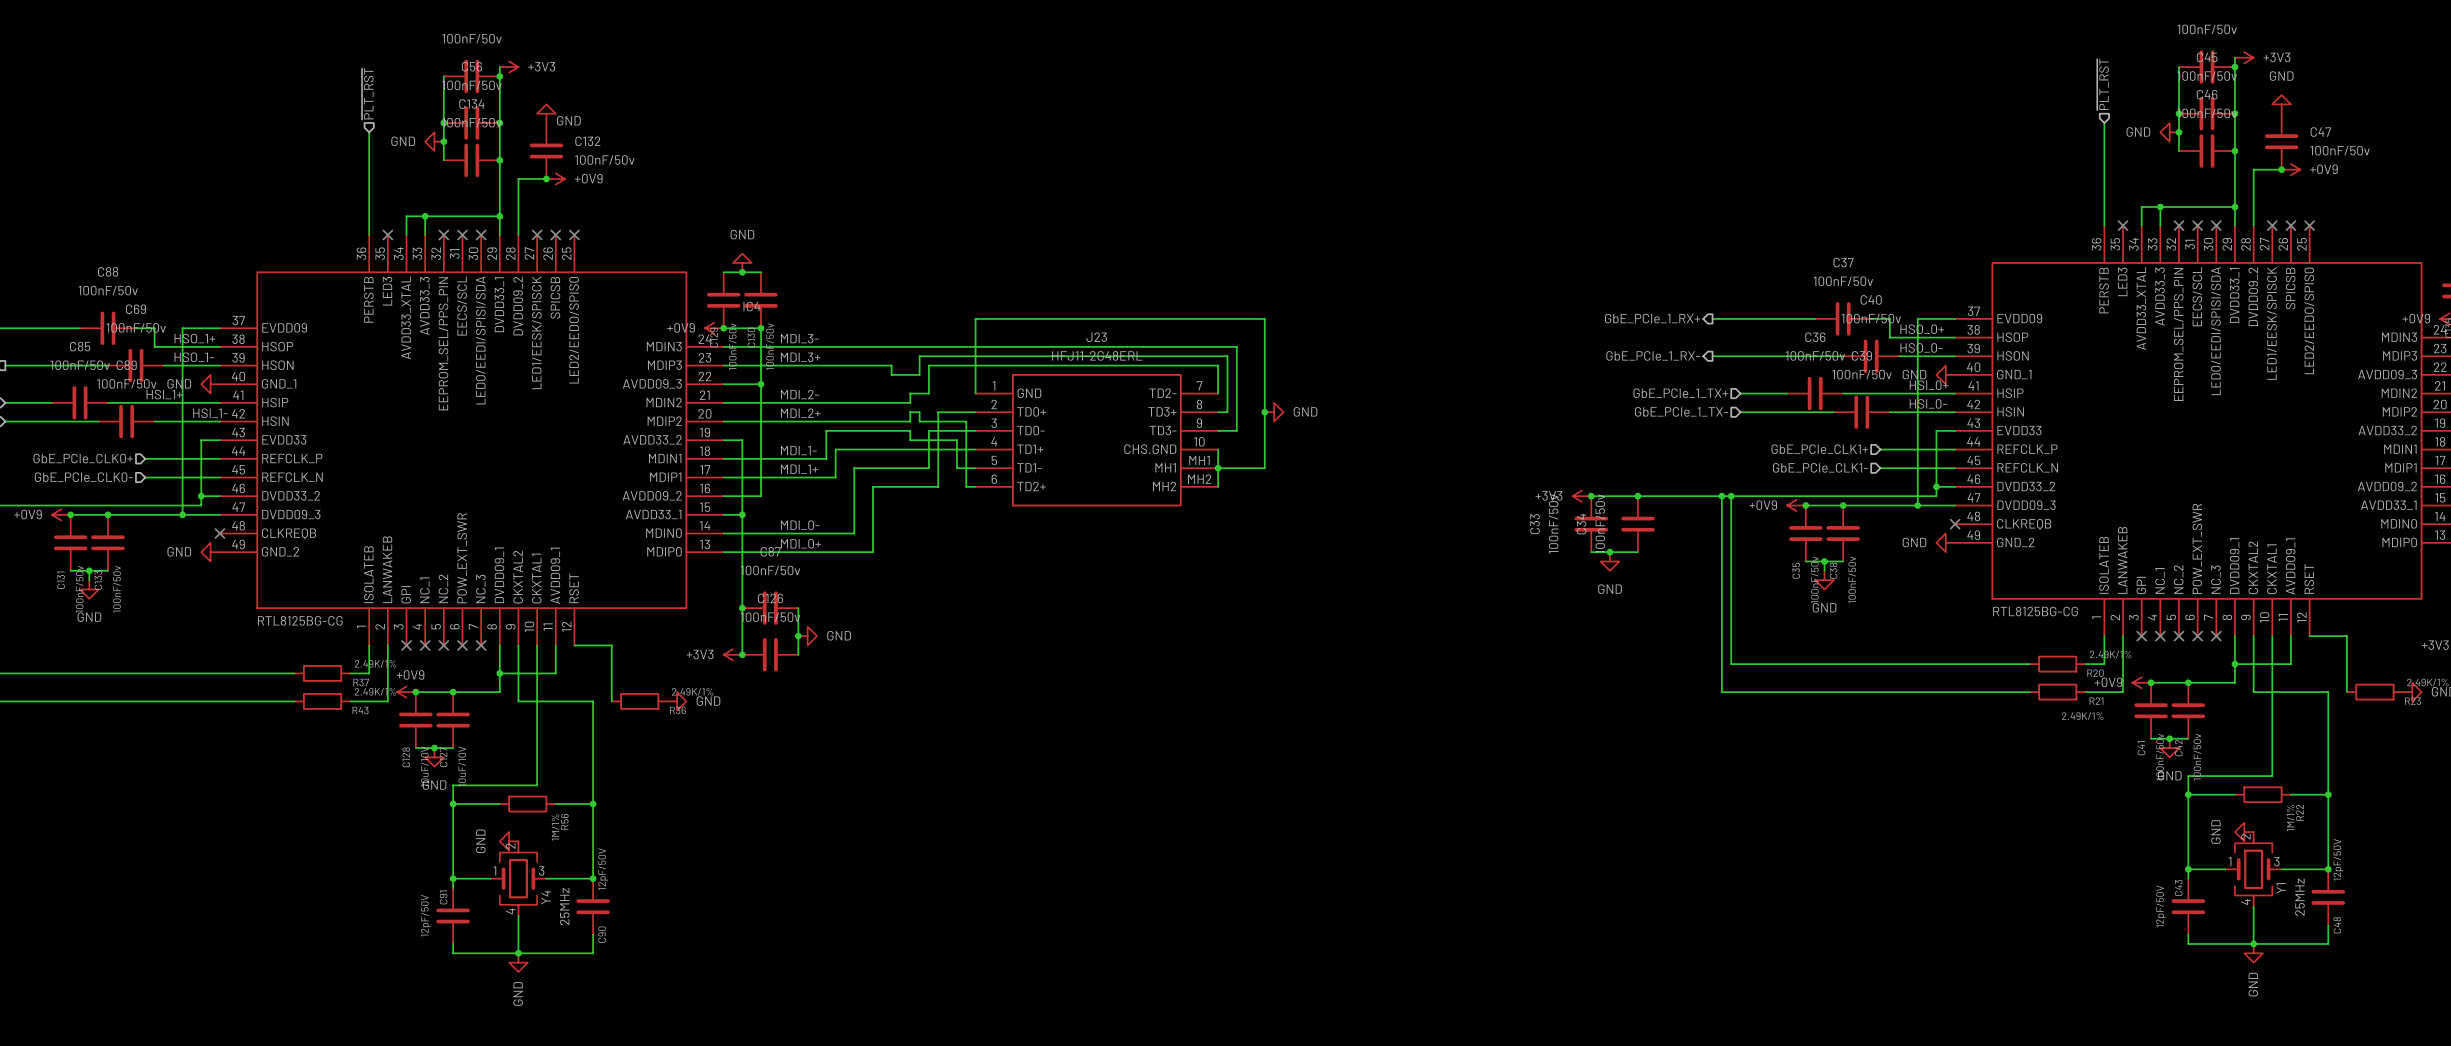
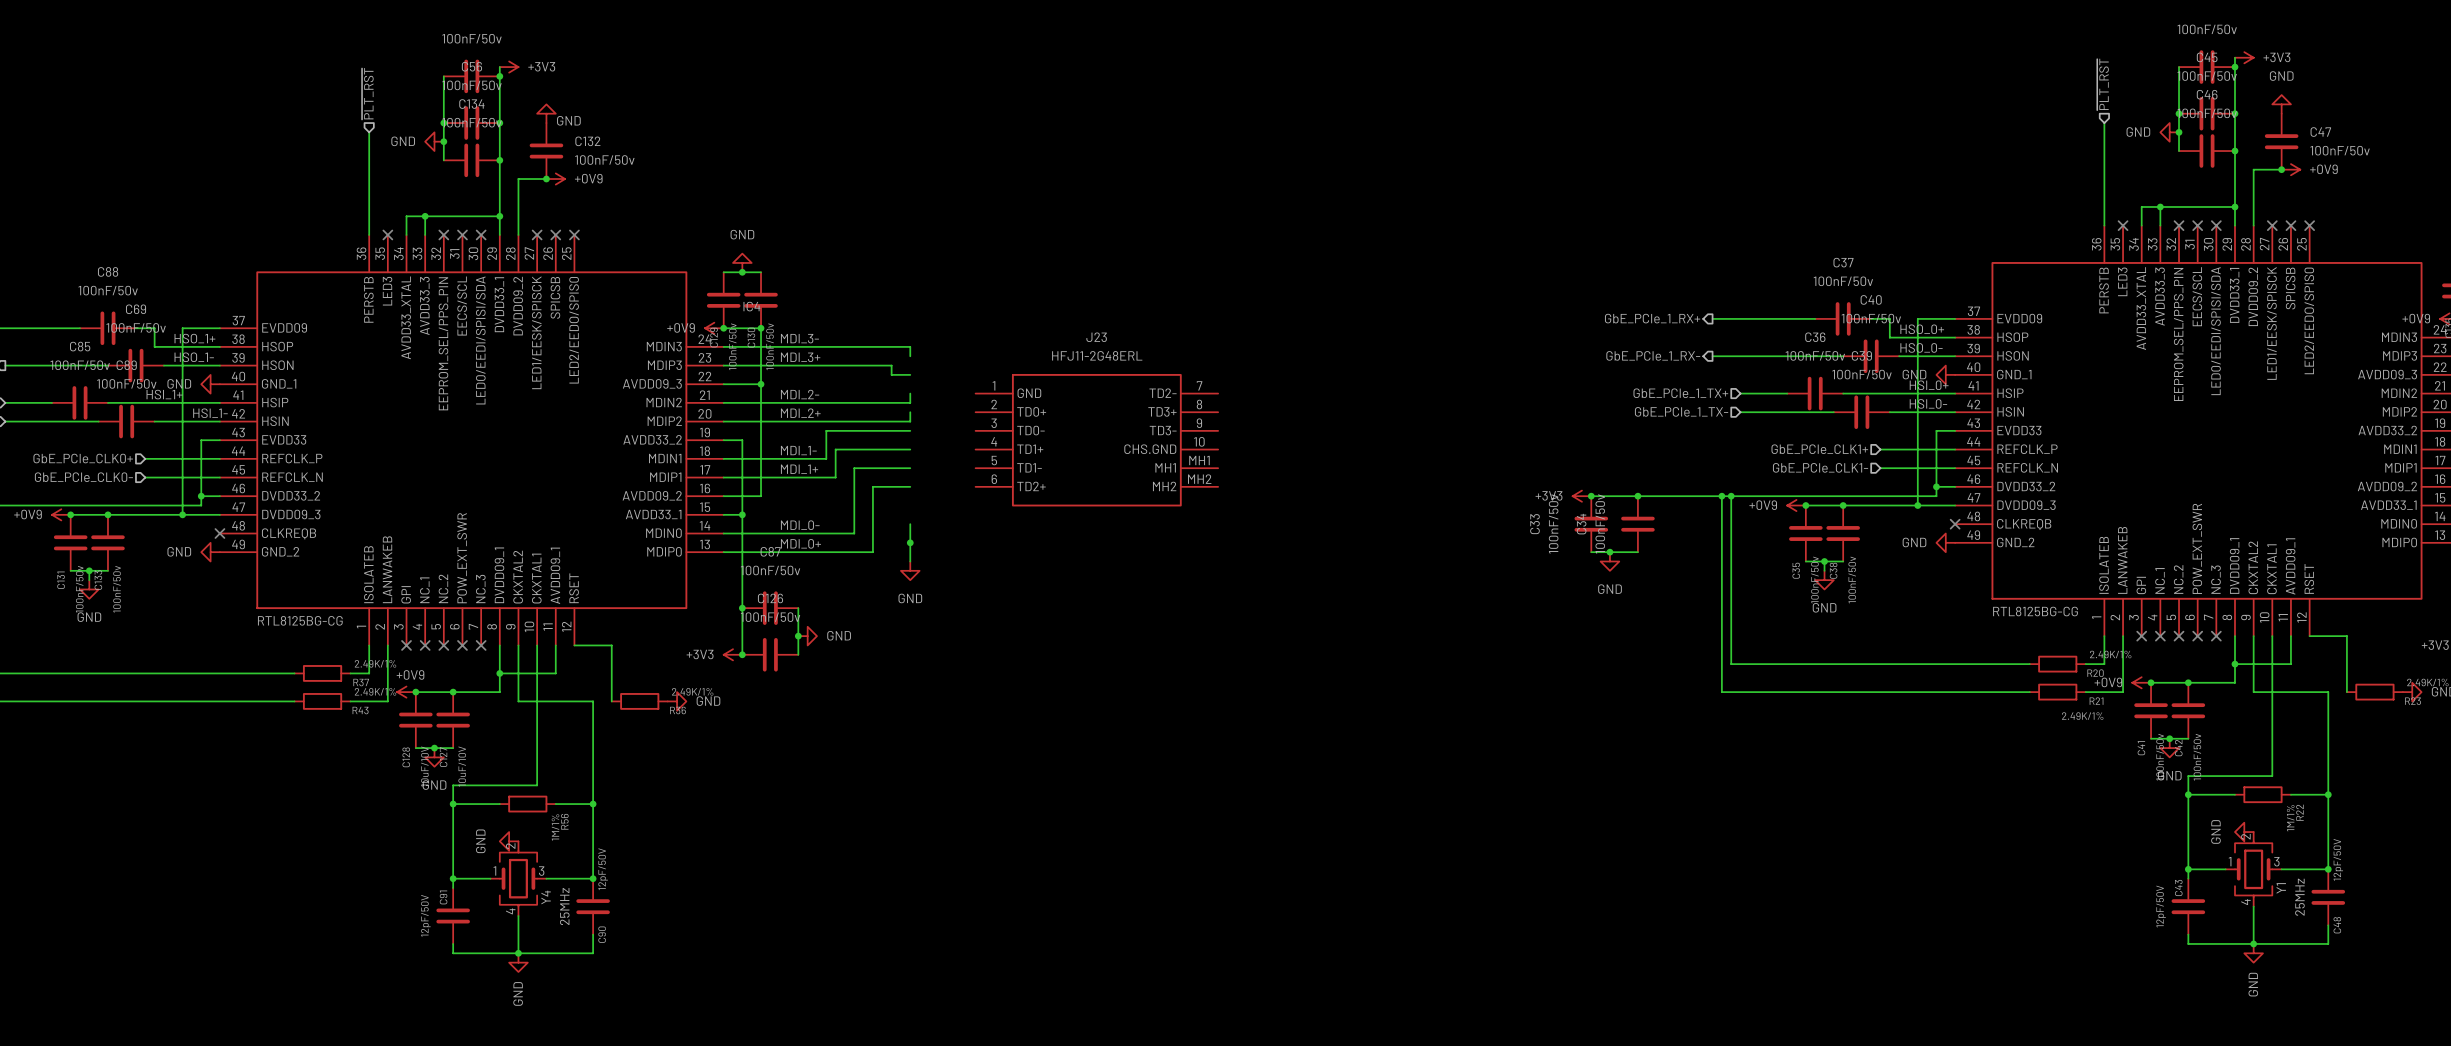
wire: (910, 346) (1236, 346) (1236, 430) (1218, 430) -> (910, 346) (910, 356)
wire: (910, 374) (919, 374) (919, 356) (1227, 356) (1227, 412) (1218, 412) -> none
wire: (910, 393) (928, 393) (928, 365) (1218, 365) (1218, 393) -> none
wire: (975, 393) (975, 318) (1264, 318) (1264, 468) (1218, 468) -> none
wire: (910, 412) (919, 412) (919, 421) (966, 421) (966, 486) (975, 486) -> none
wire: (975, 412) (938, 412) (938, 486) (910, 486) -> none
junction: (1264, 412) -> none
power symbol: GND (1274, 412) -> none
wire: (910, 430) (910, 440) (956, 440) (956, 468) (975, 468) -> none
wire: (975, 430) (928, 430) (928, 468) (910, 468) -> none
wire: (910, 449) (975, 449) -> none
wire: (1218, 449) (1218, 486) -> none
junction: (1218, 468) -> none
wire: none -> (910, 524) (910, 561)
junction: none -> (910, 542)
power symbol: none -> GND (910, 570)

